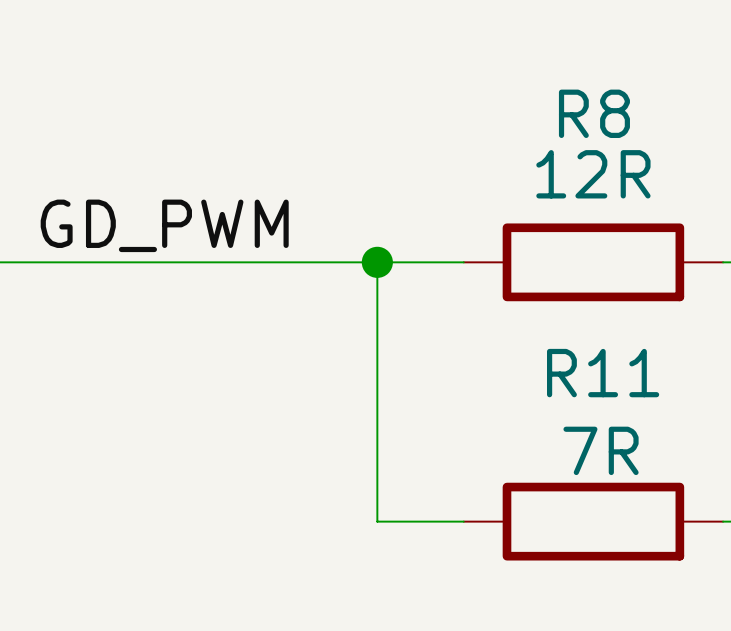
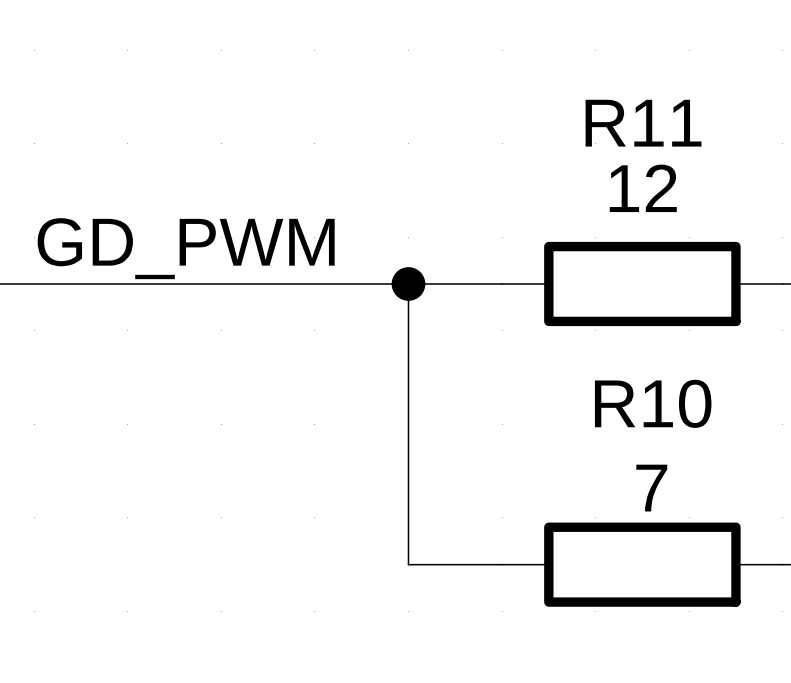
R8 name: R8 (594, 113) -> R11 (643, 123)
R8 value: 12R (593, 174) -> 12 (643, 188)
R11 name: R11 (603, 373) -> R10 (653, 403)
R11 value: 7R (601, 450) -> 7 (651, 488)

